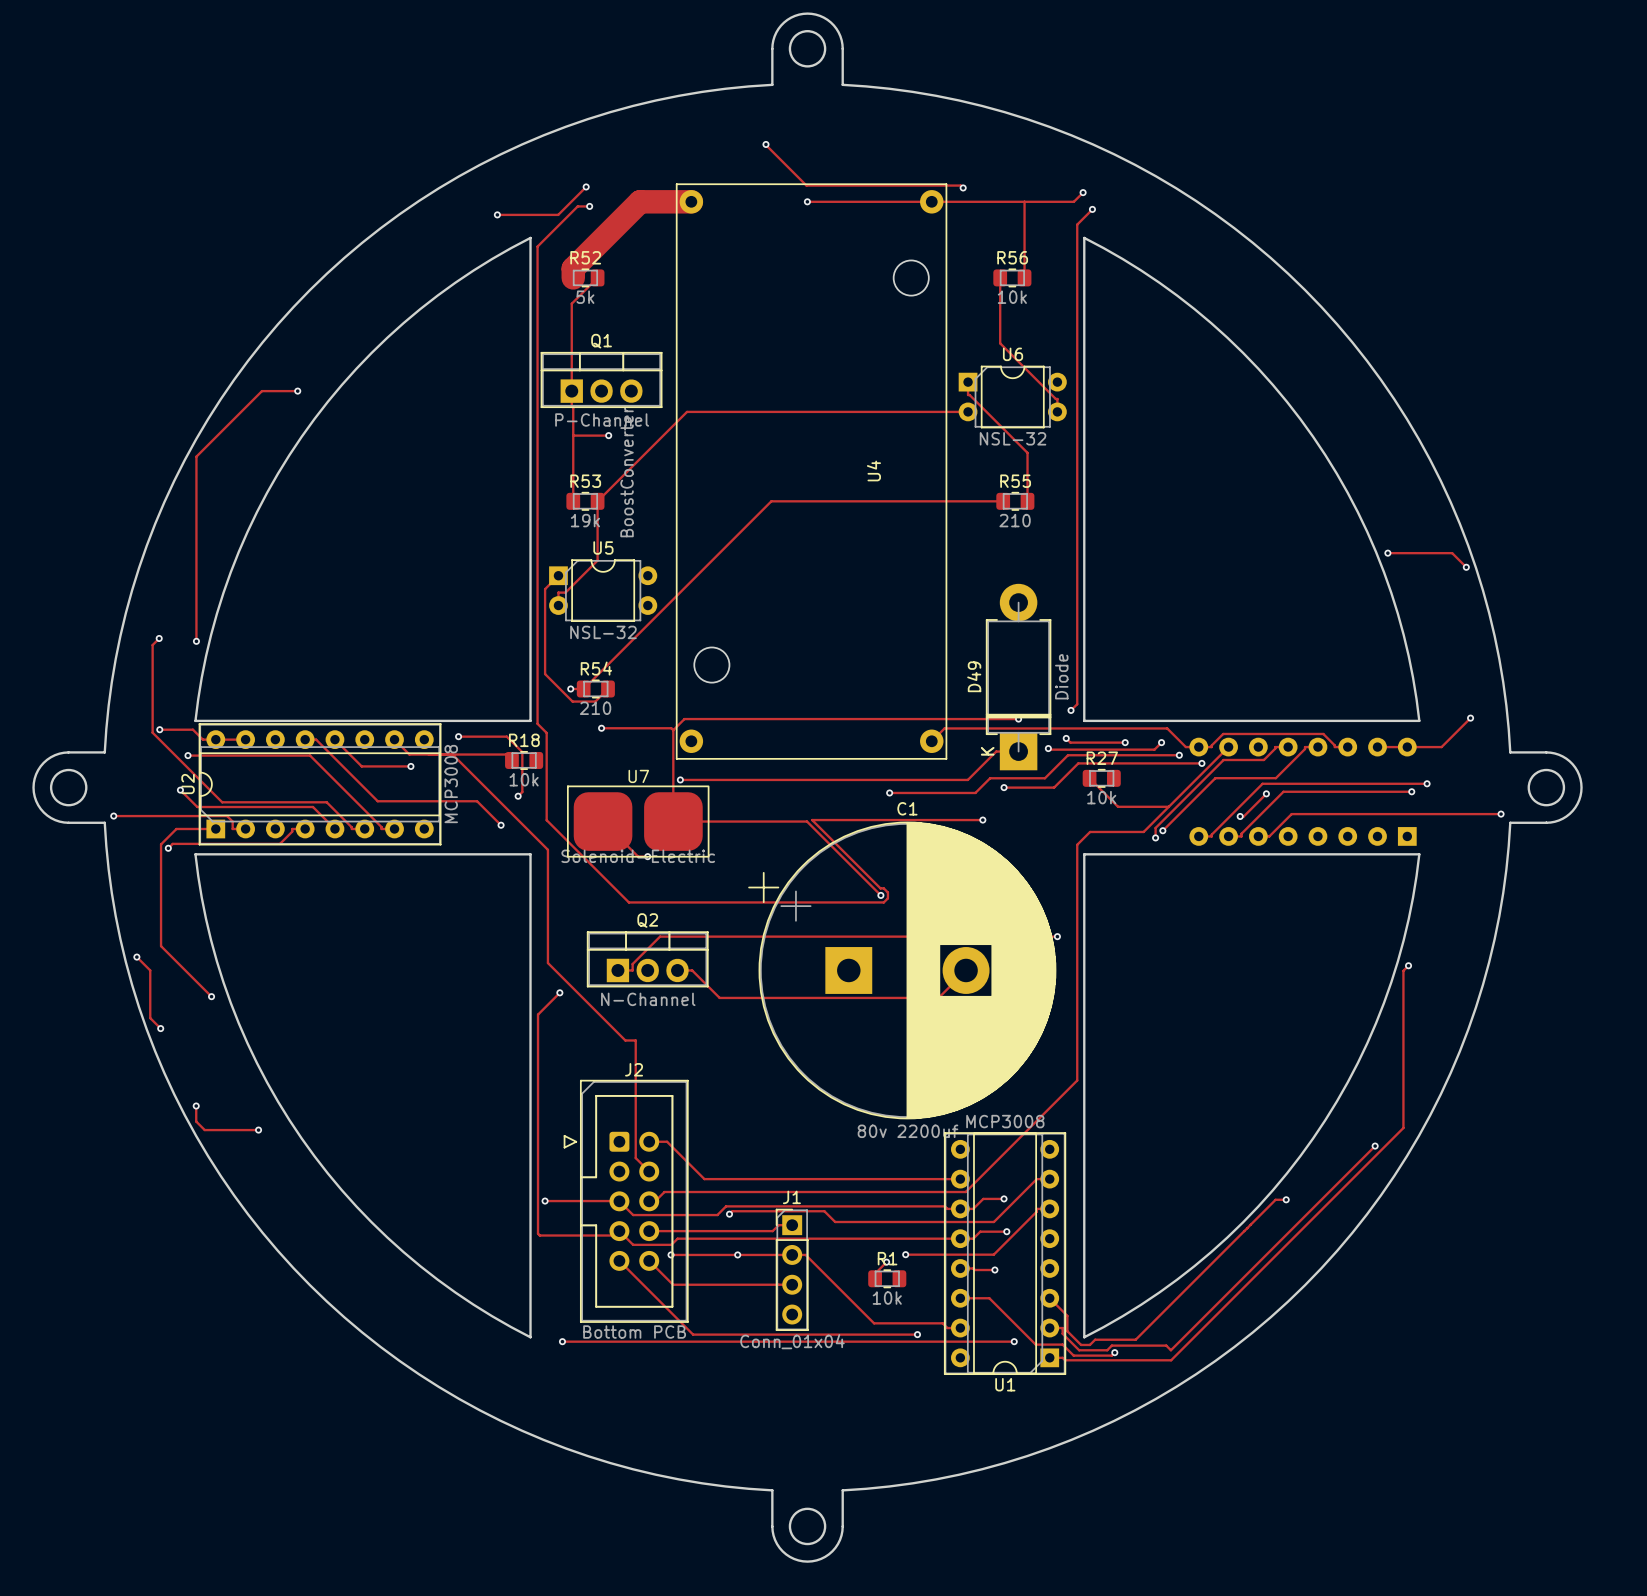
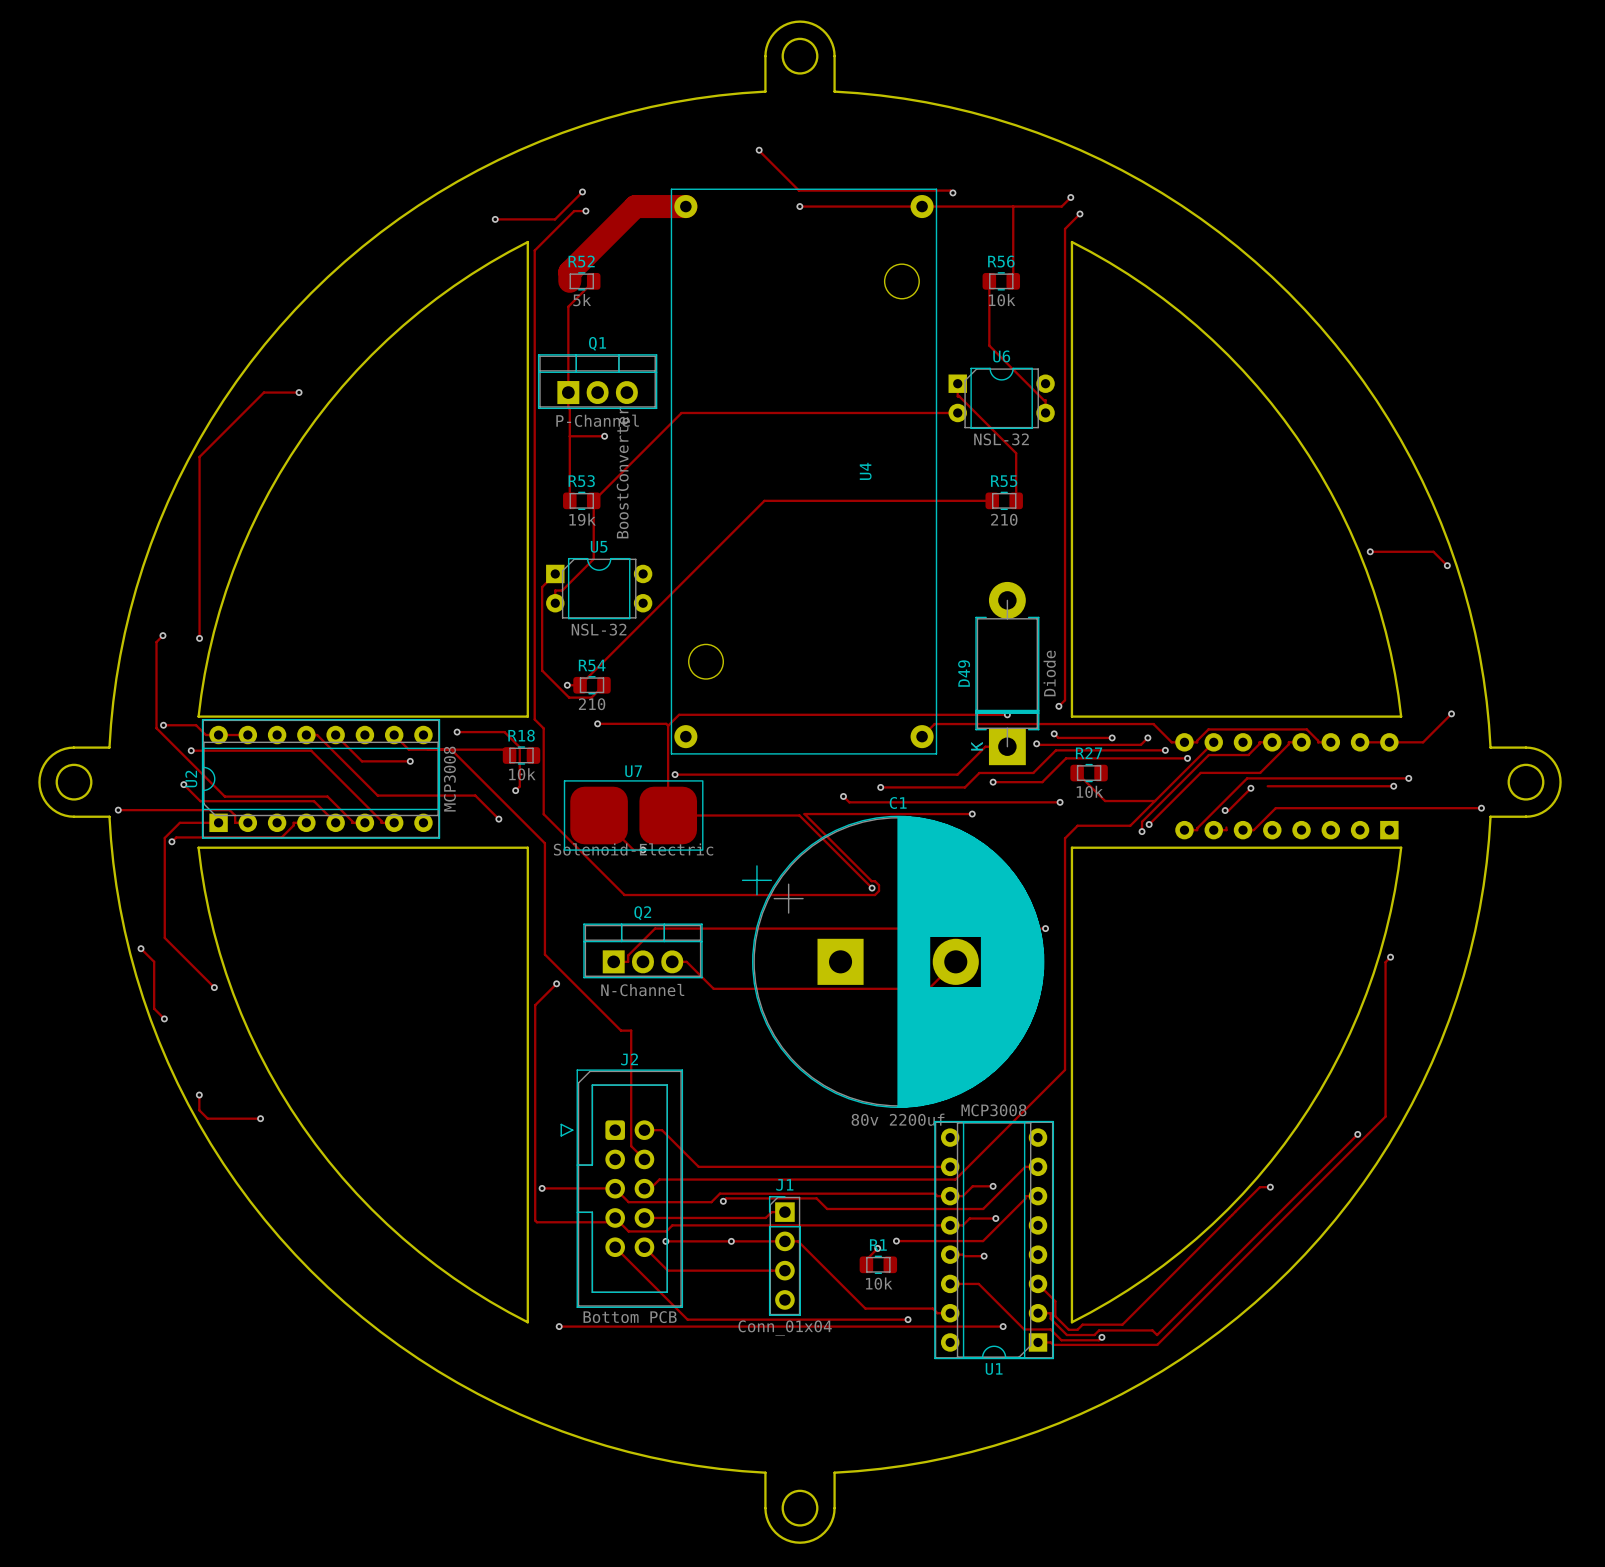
track: (1283, 791) (1241, 833) -> none
track: none -> (843, 796) (849, 802) (1060, 802)
via: none -> (843, 796)
via: none -> (1060, 802)

